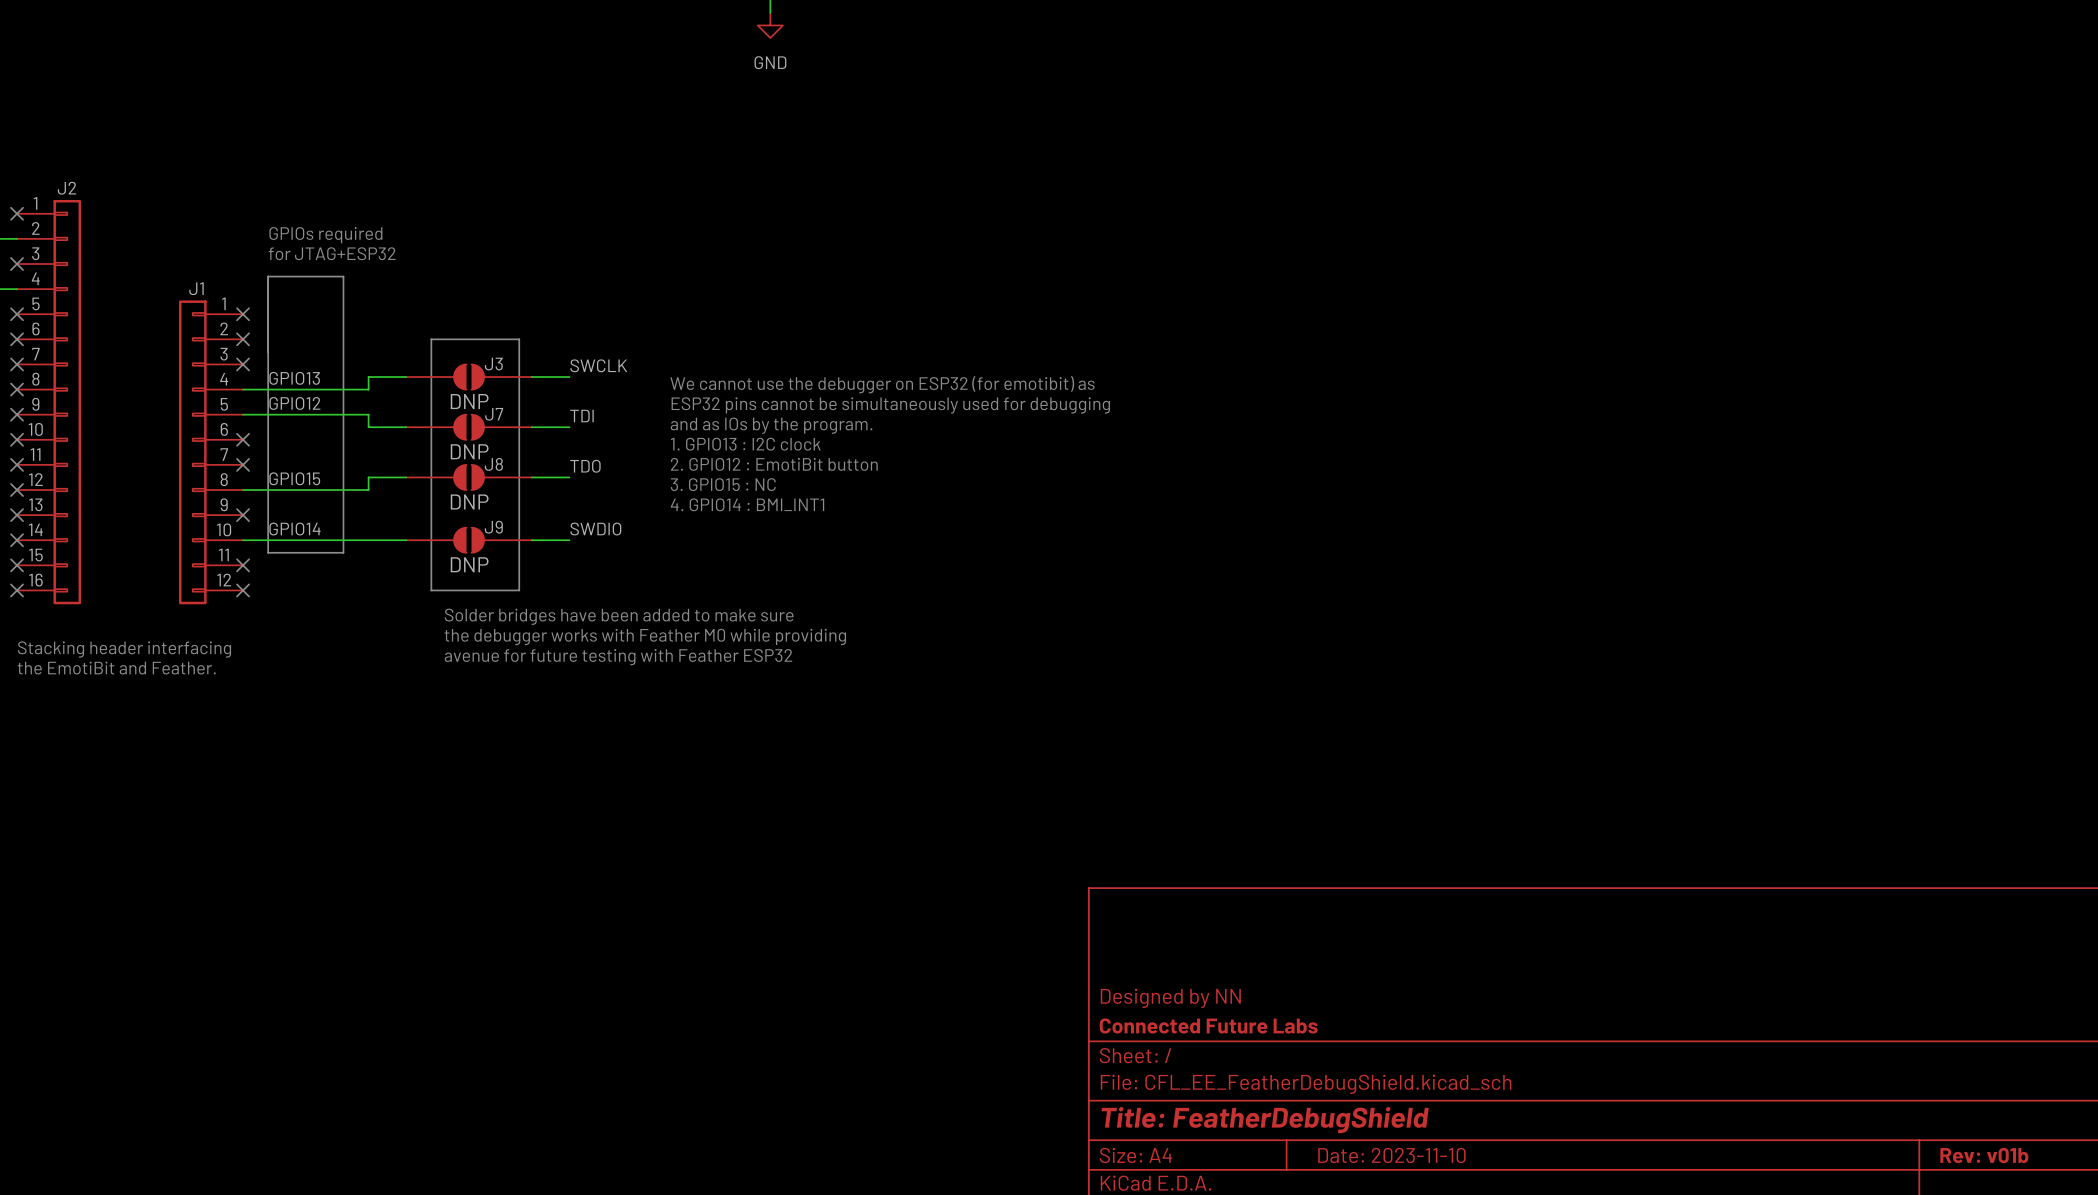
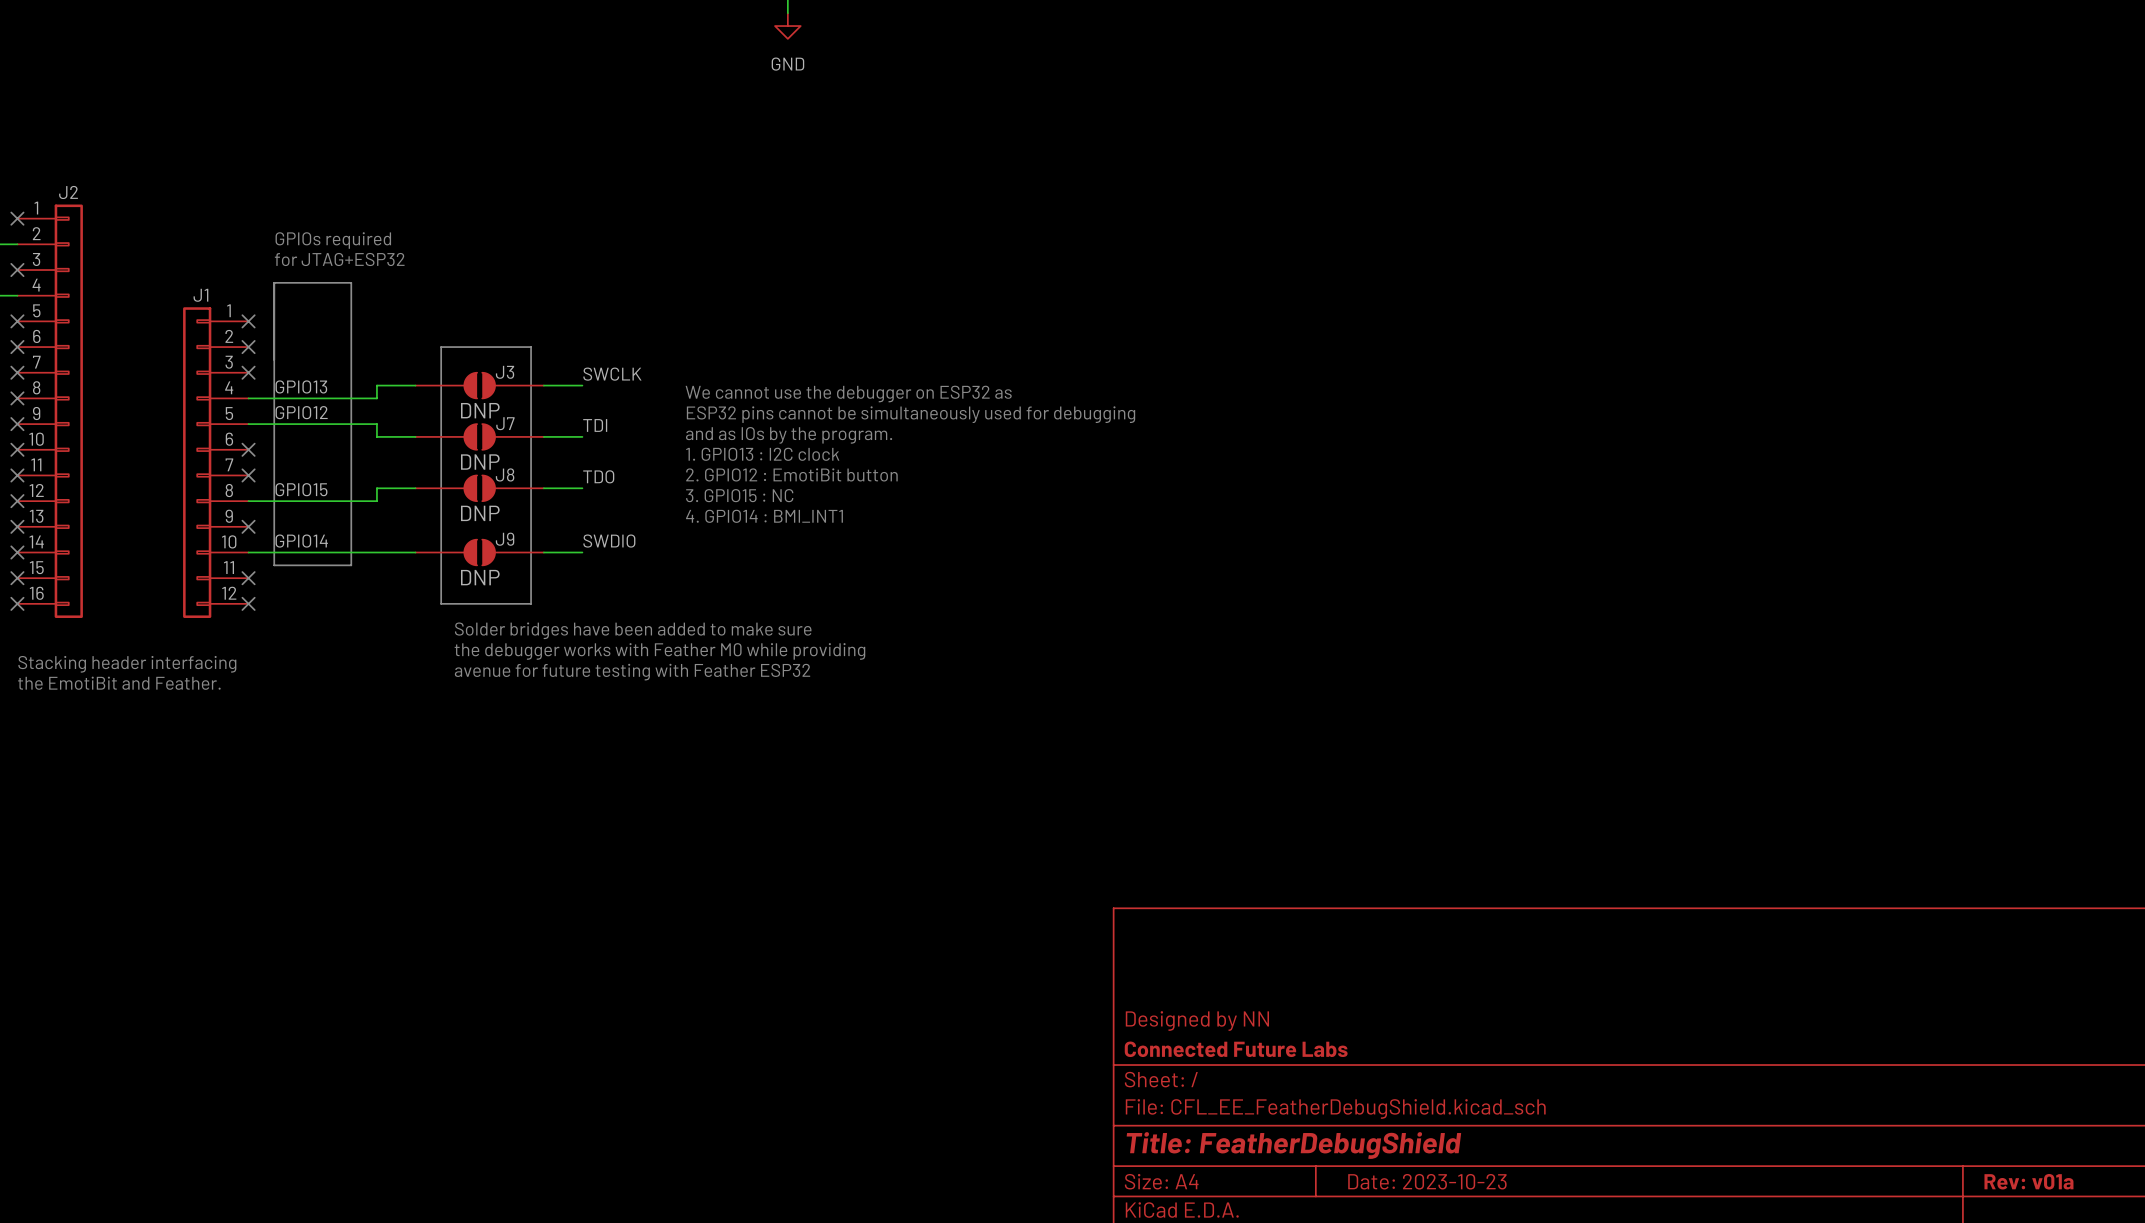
text: We cannot use the debugger on ESP32 (for emotibit) as (882, 384) -> We cannot use the debugger on ESP32 as (848, 394)
title block: Date: 2023-11-10 (1391, 1155) -> Date: 2023-10-23 (1427, 1181)
title block: Rev: v01b (1984, 1155) -> Rev: v01a (2028, 1181)

